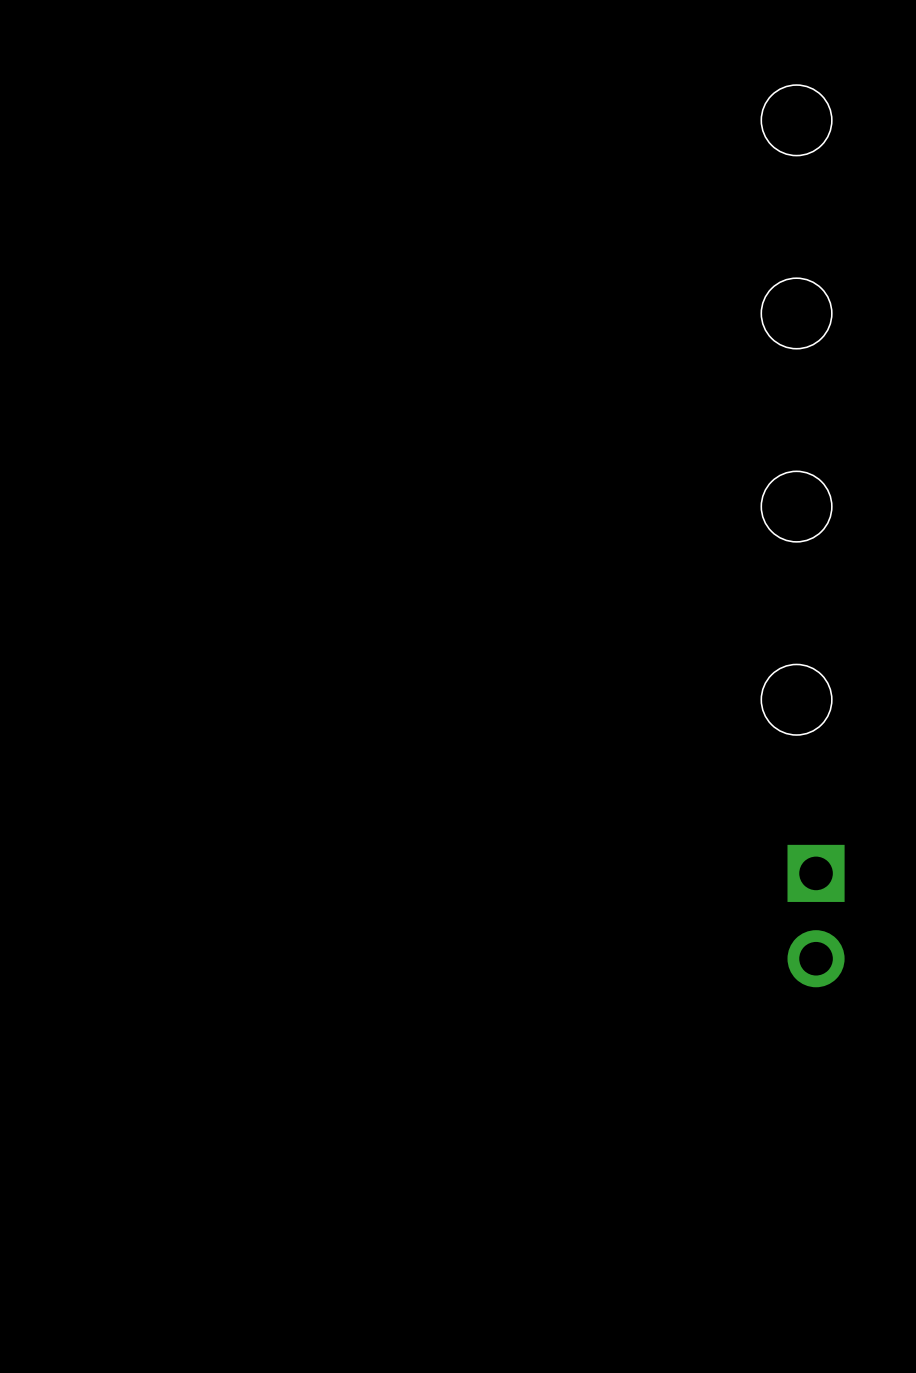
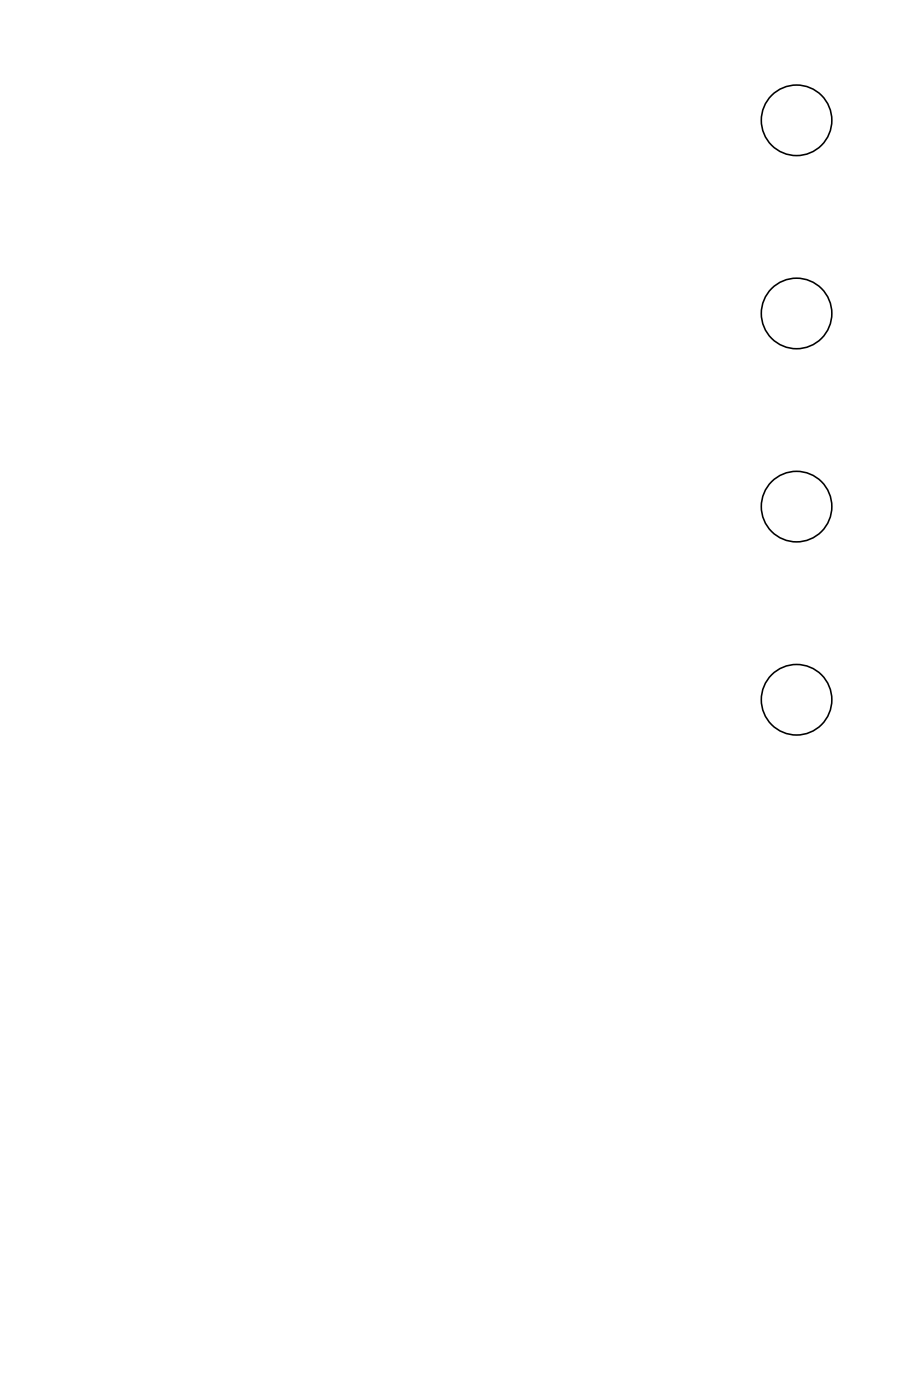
part: (816, 916) -> none

